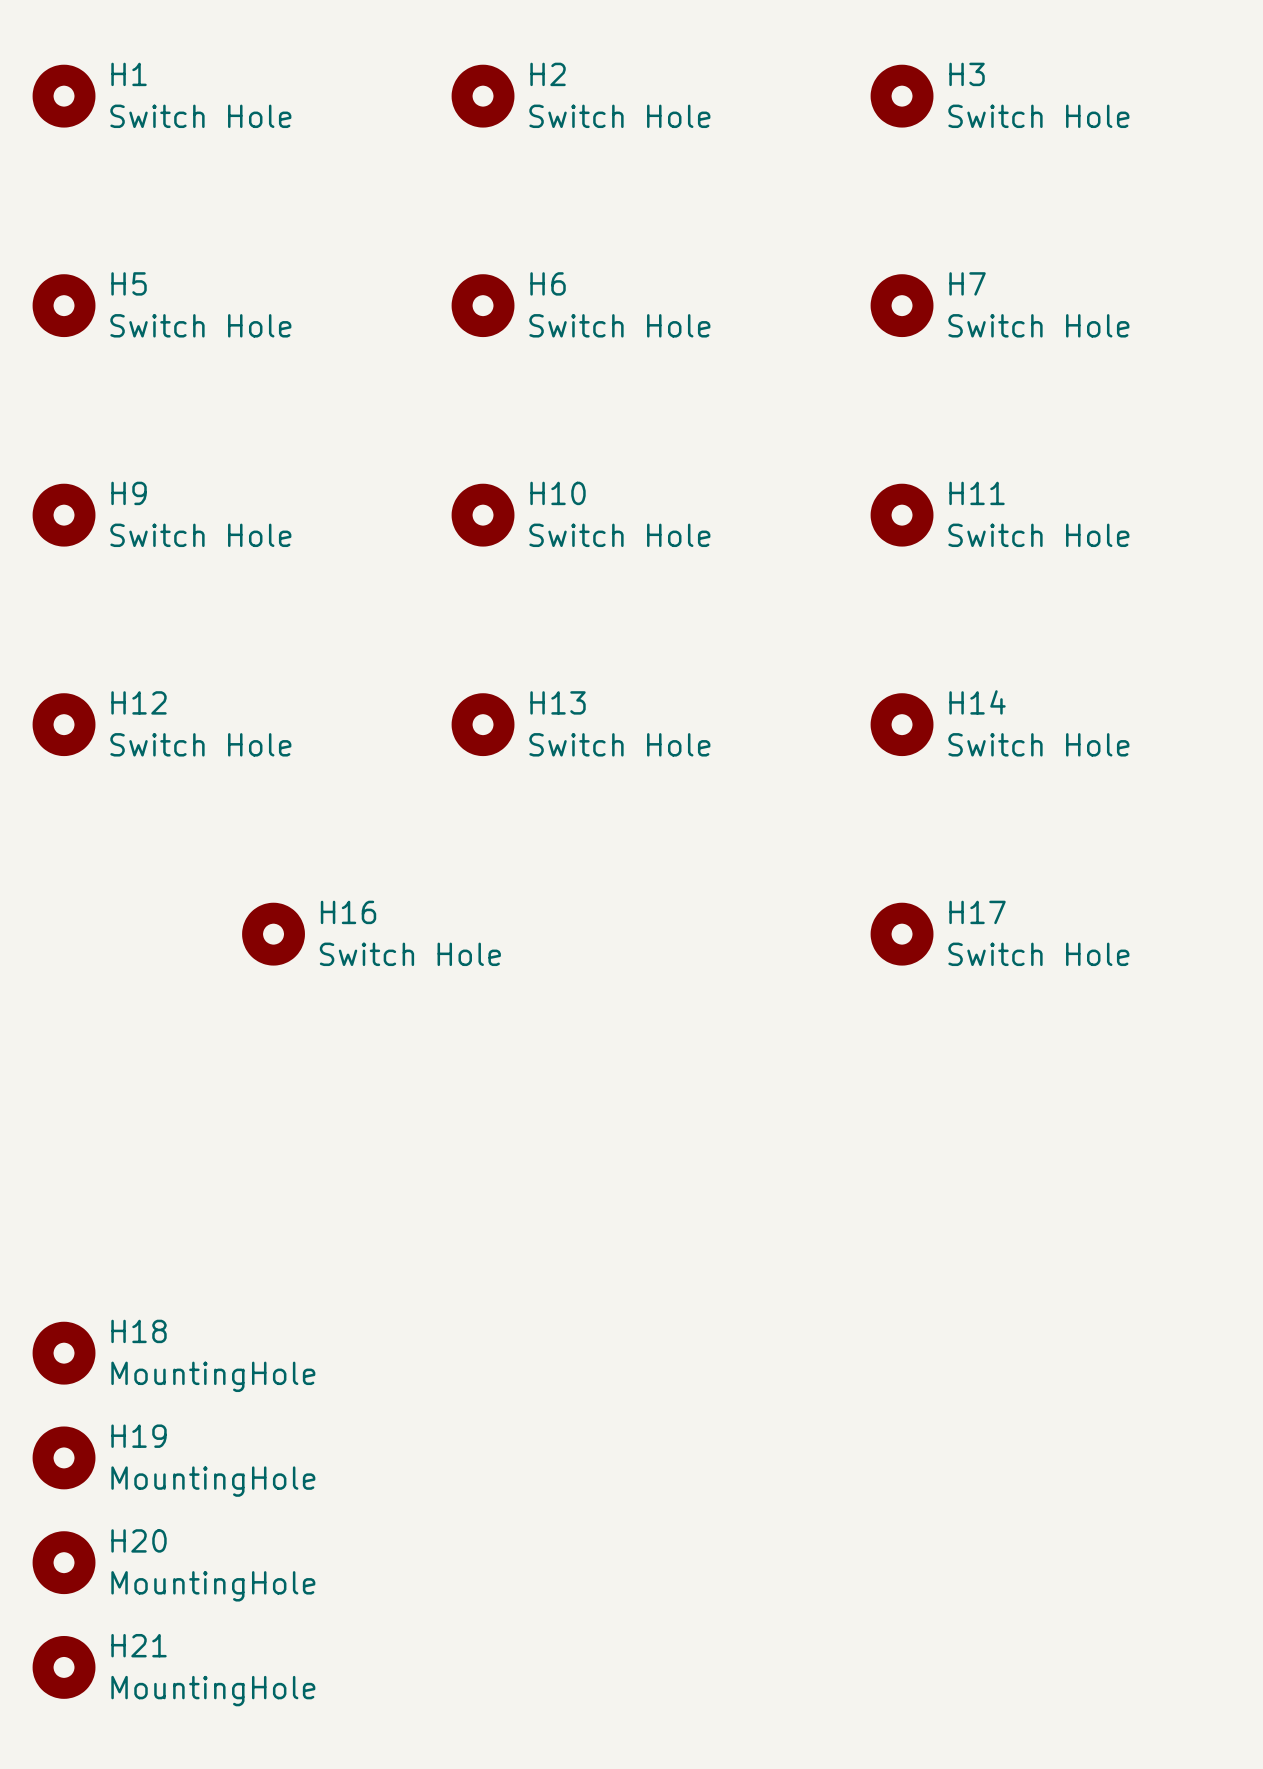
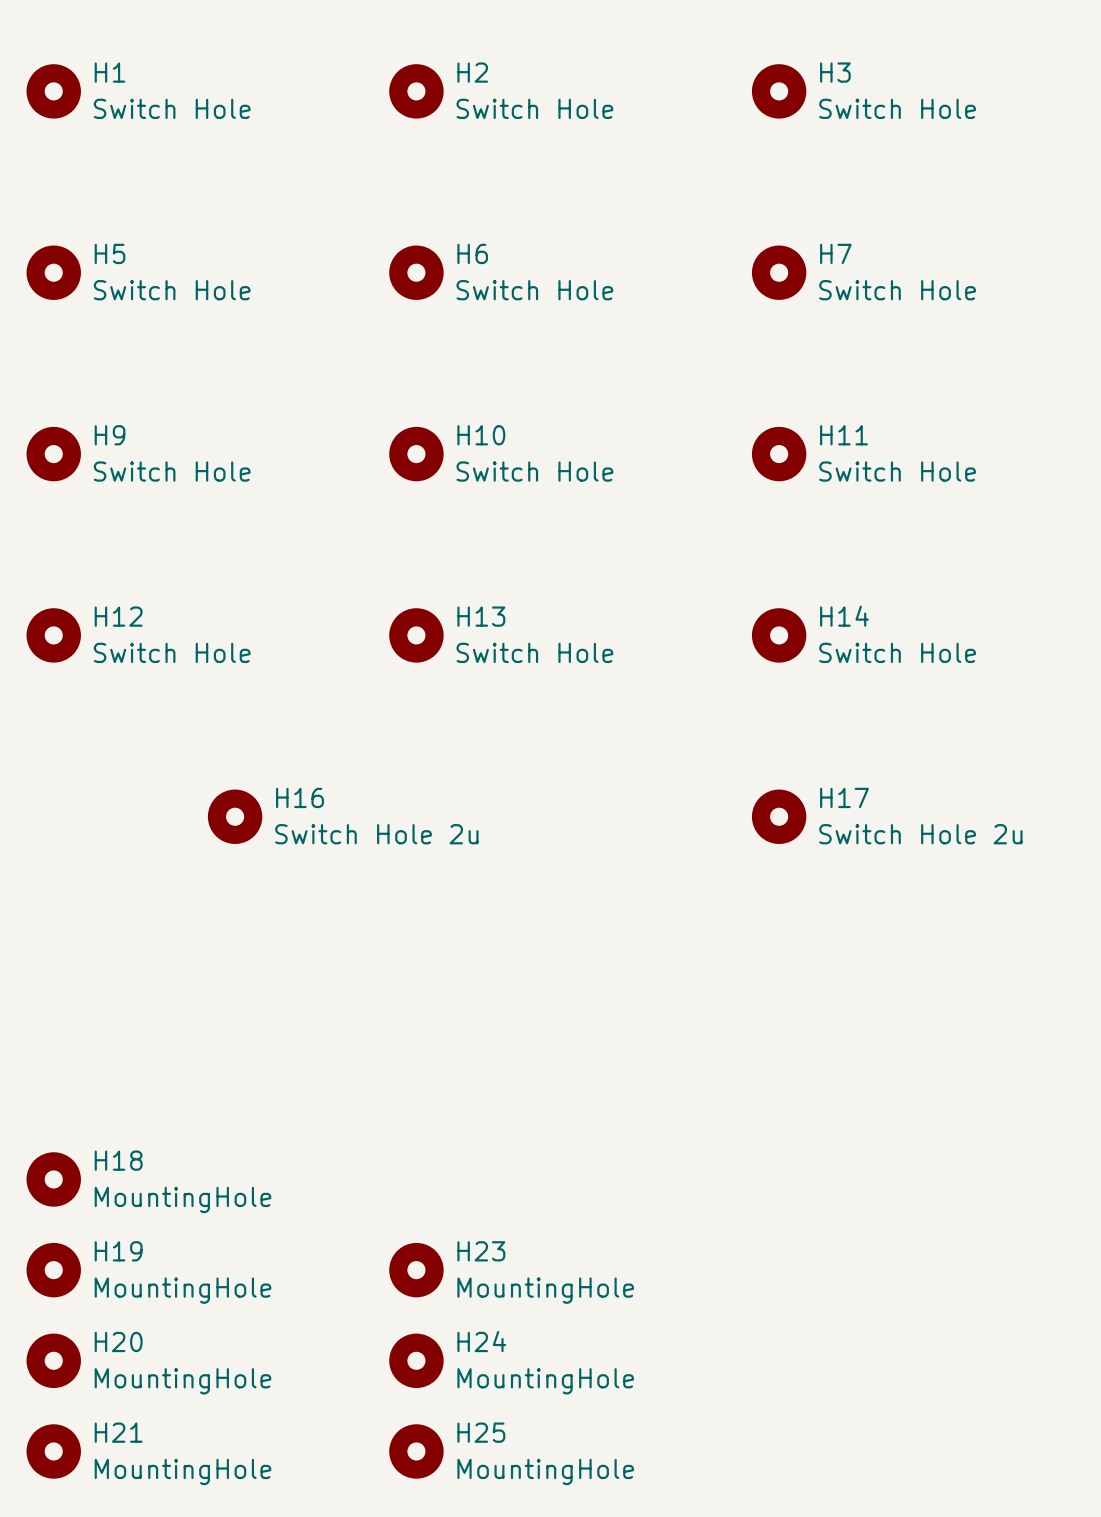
H16 value: Switch Hole (410, 954) -> Switch Hole 2u (376, 834)
H17 value: Switch Hole (1038, 954) -> Switch Hole 2u (920, 834)
H23: none -> MountingHole (416, 1270)
H24: none -> MountingHole (416, 1360)
H25: none -> MountingHole (416, 1451)

